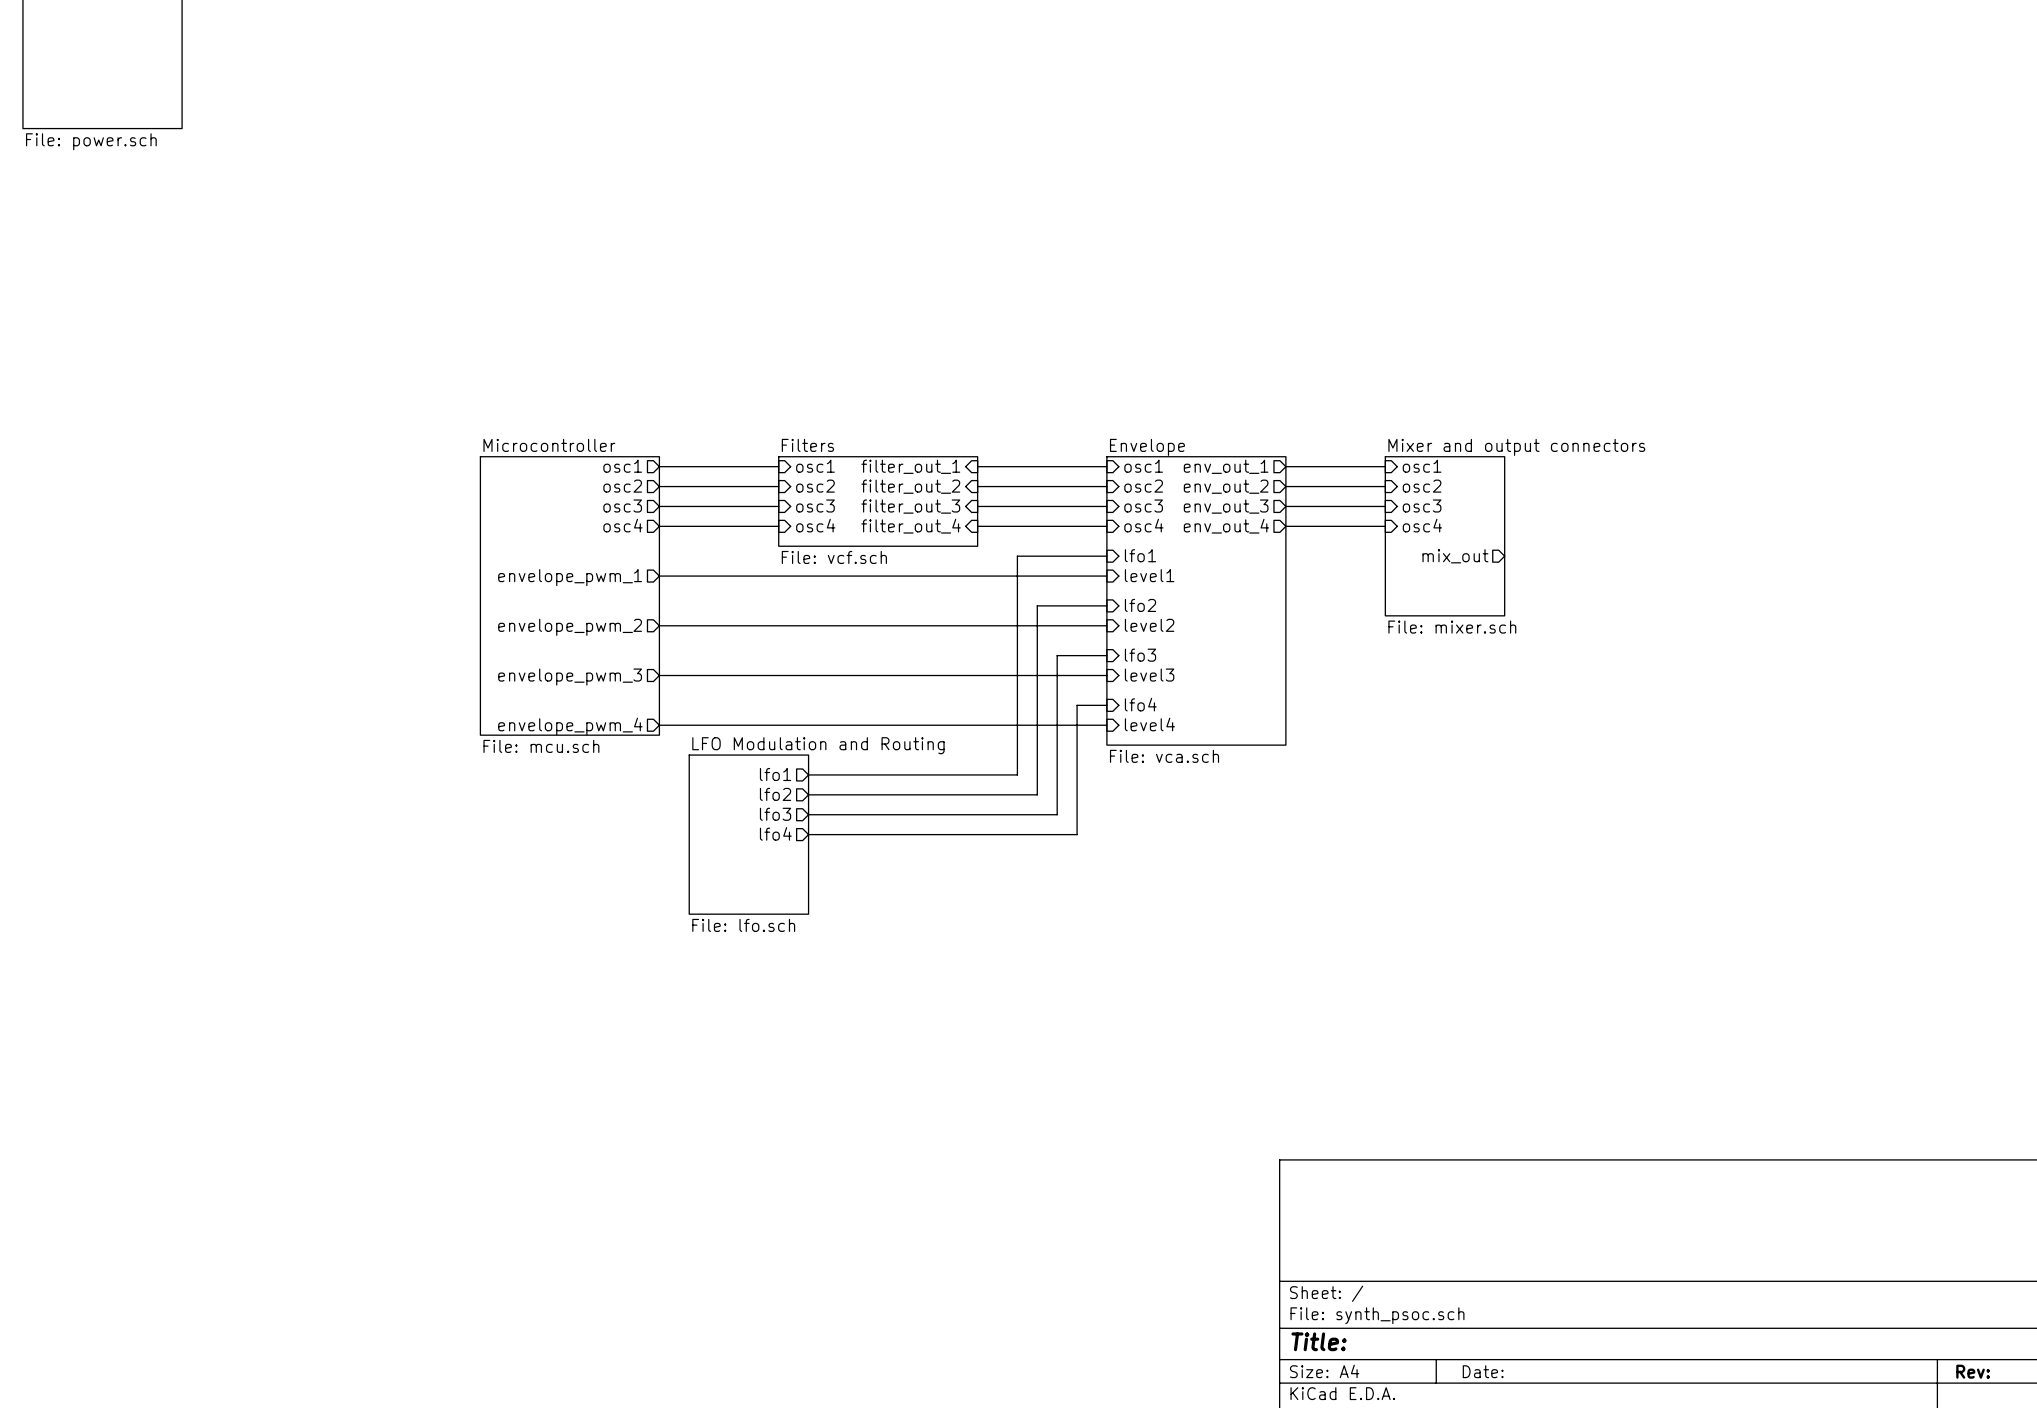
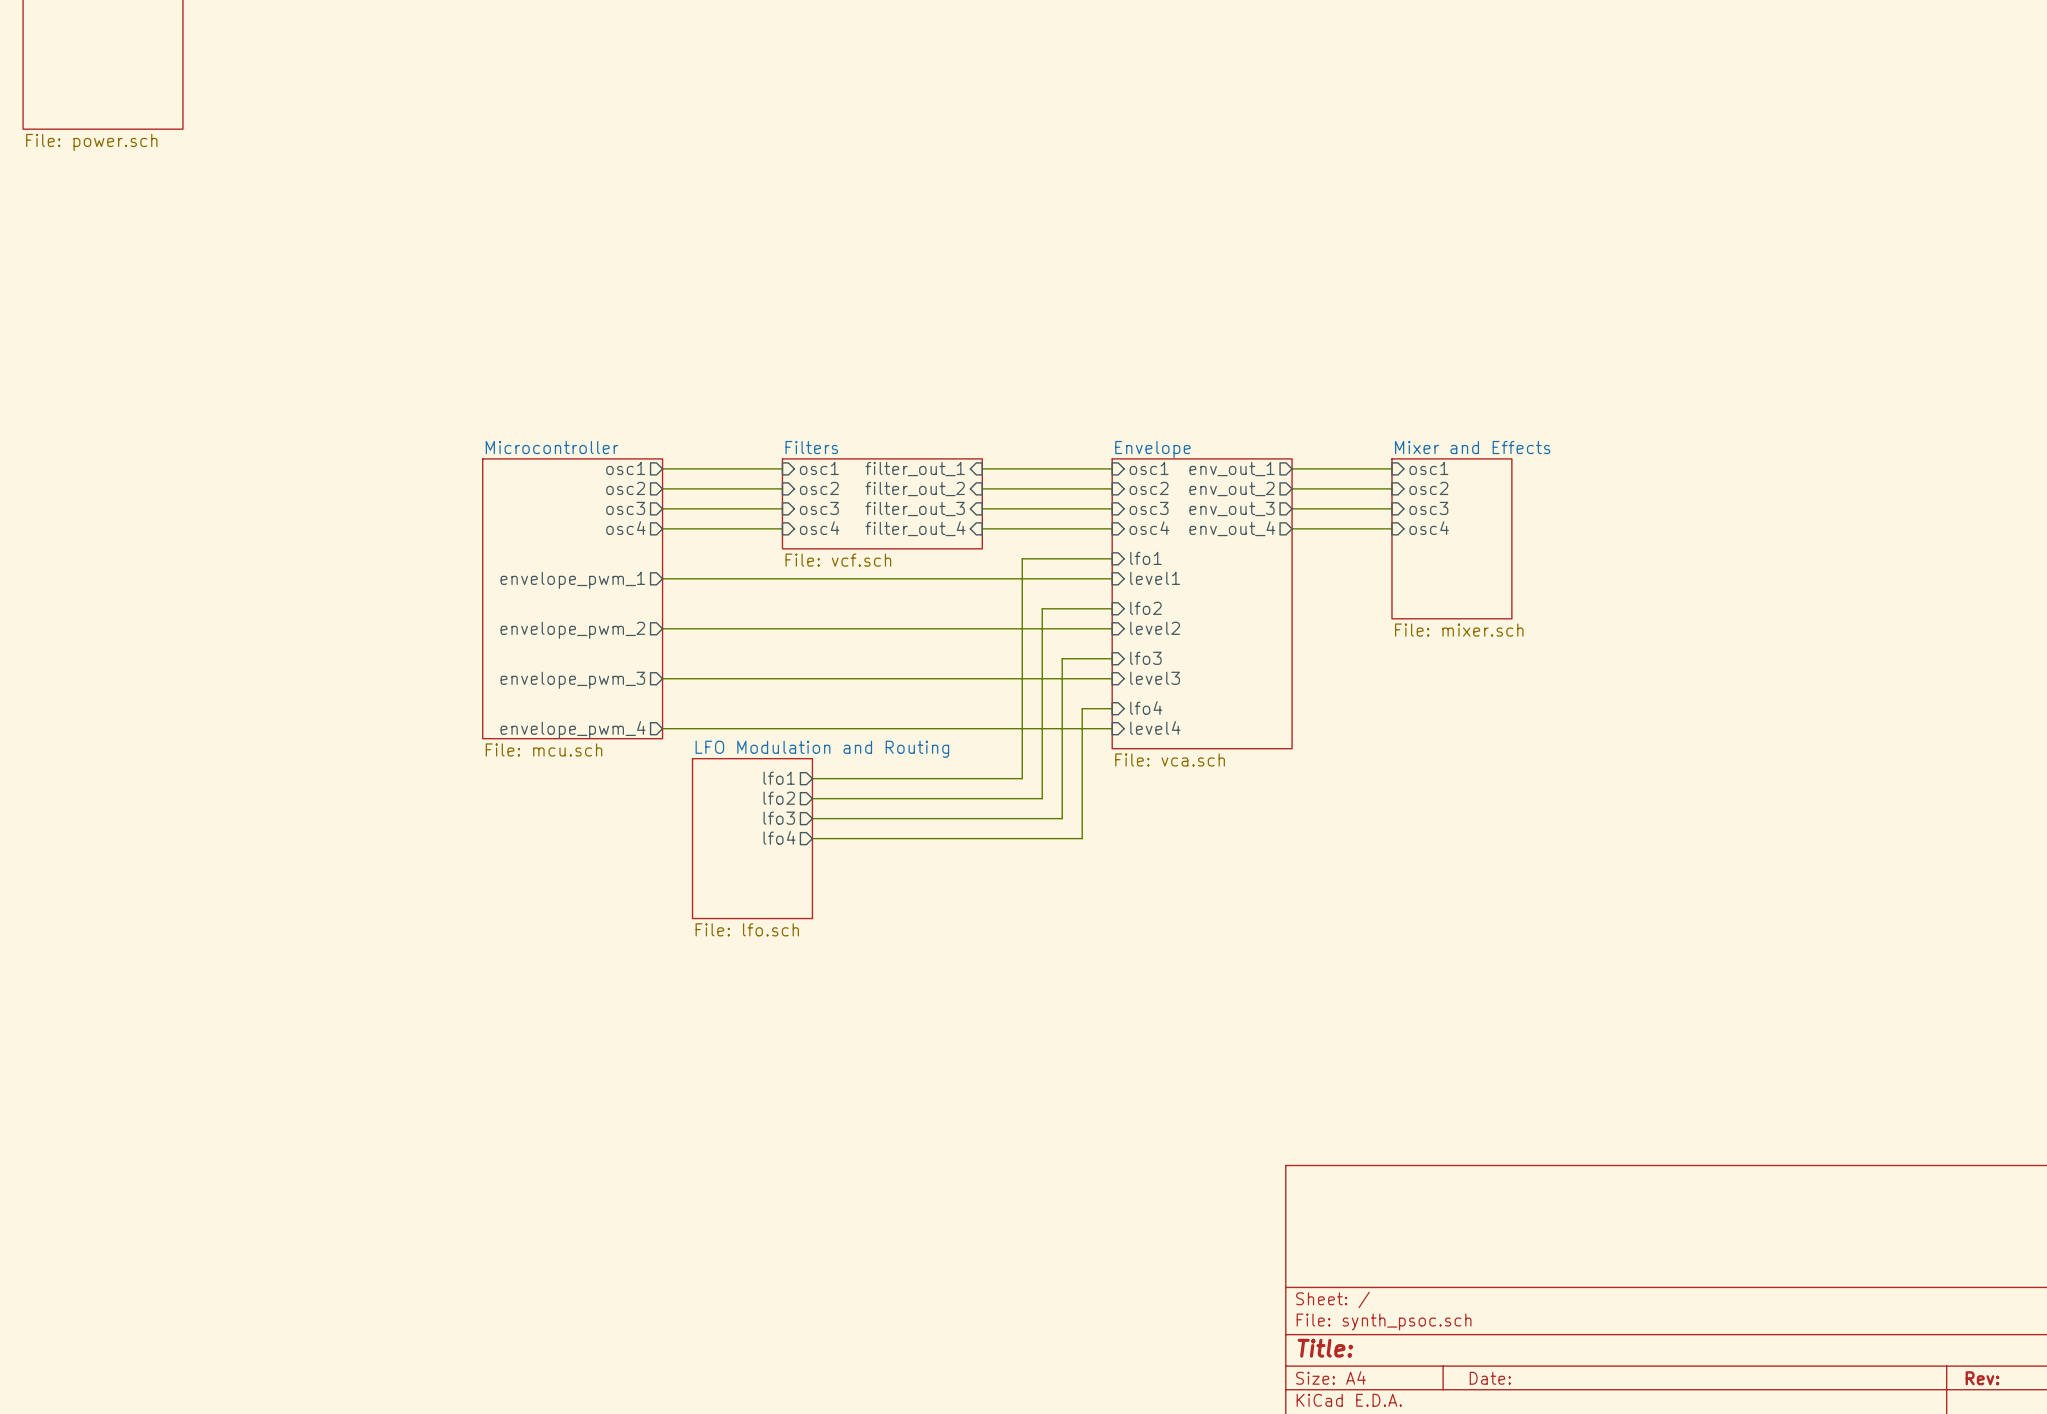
sheet Mixer and output connectors name: Mixer and output connectors (1516, 447) -> Mixer and Effects (1472, 447)
sheet pin: mix_out (1455, 556) -> none

